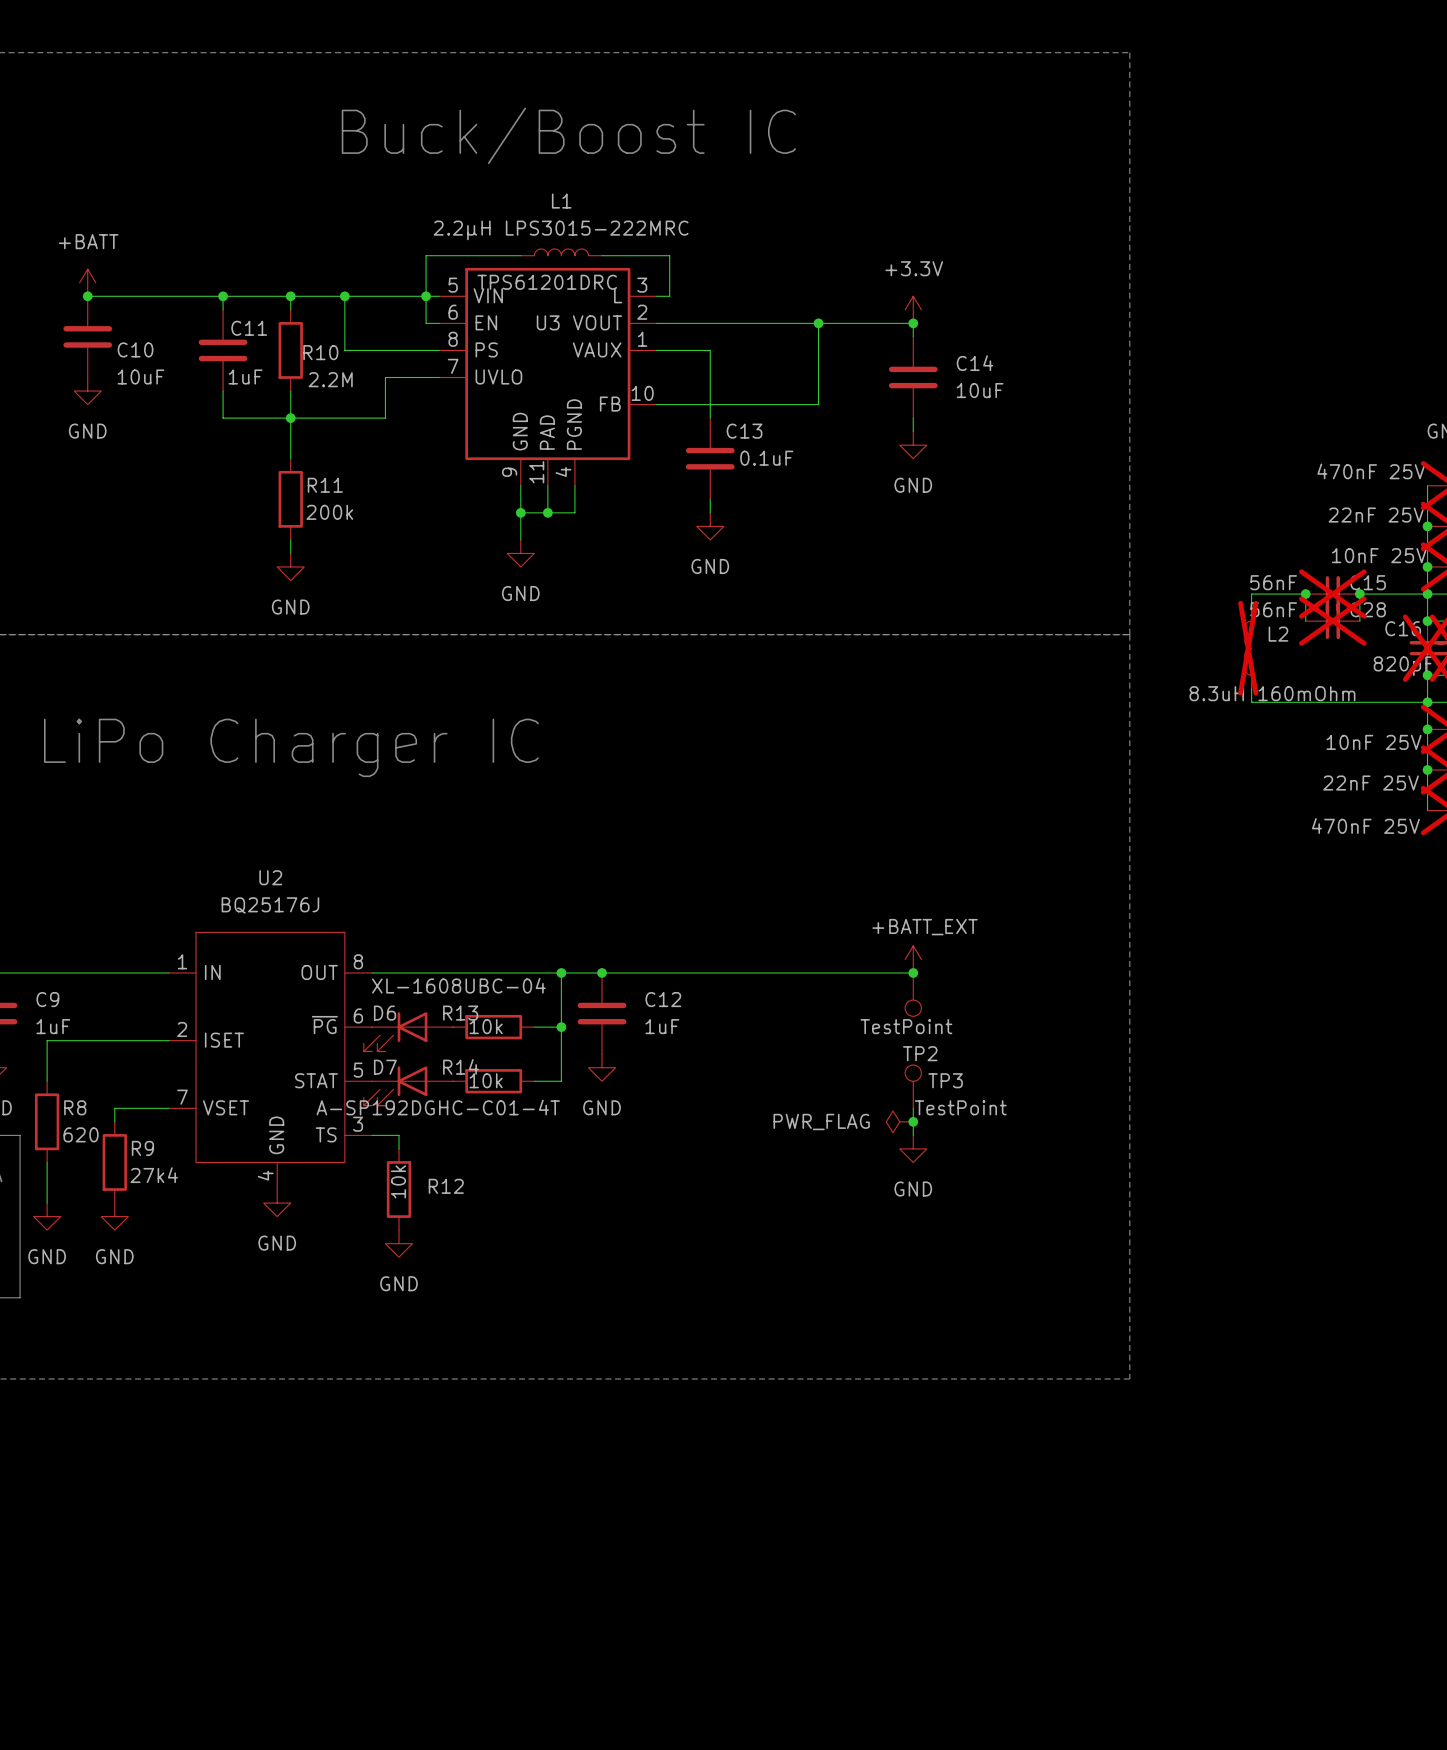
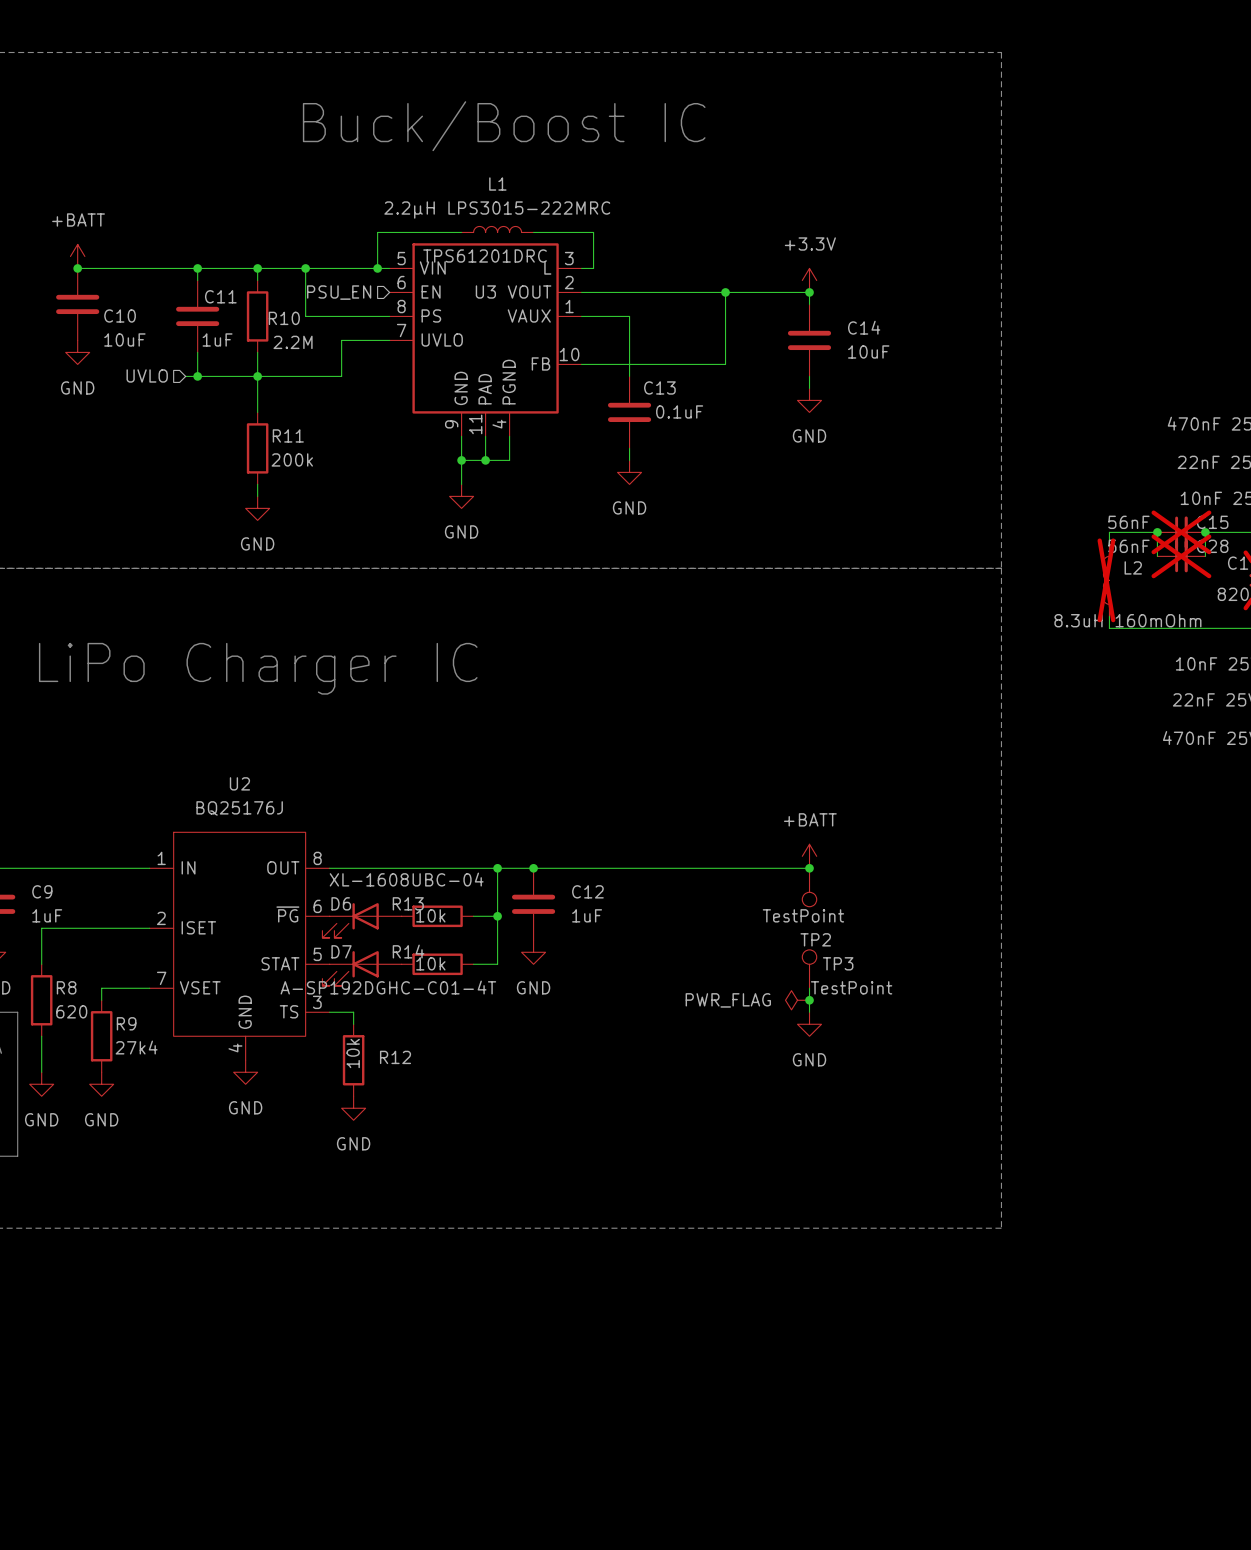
wire: (426, 296) (426, 323) (439, 323) -> none
hierarchical label: none -> PSU_EN (339, 292)
hierarchical label: none -> UVLO (147, 375)
wire: none -> (185, 376) (197, 376)
junction: none -> (197, 376)
power symbol: +BATT_EXT (913, 959) -> +BATT (809, 856)

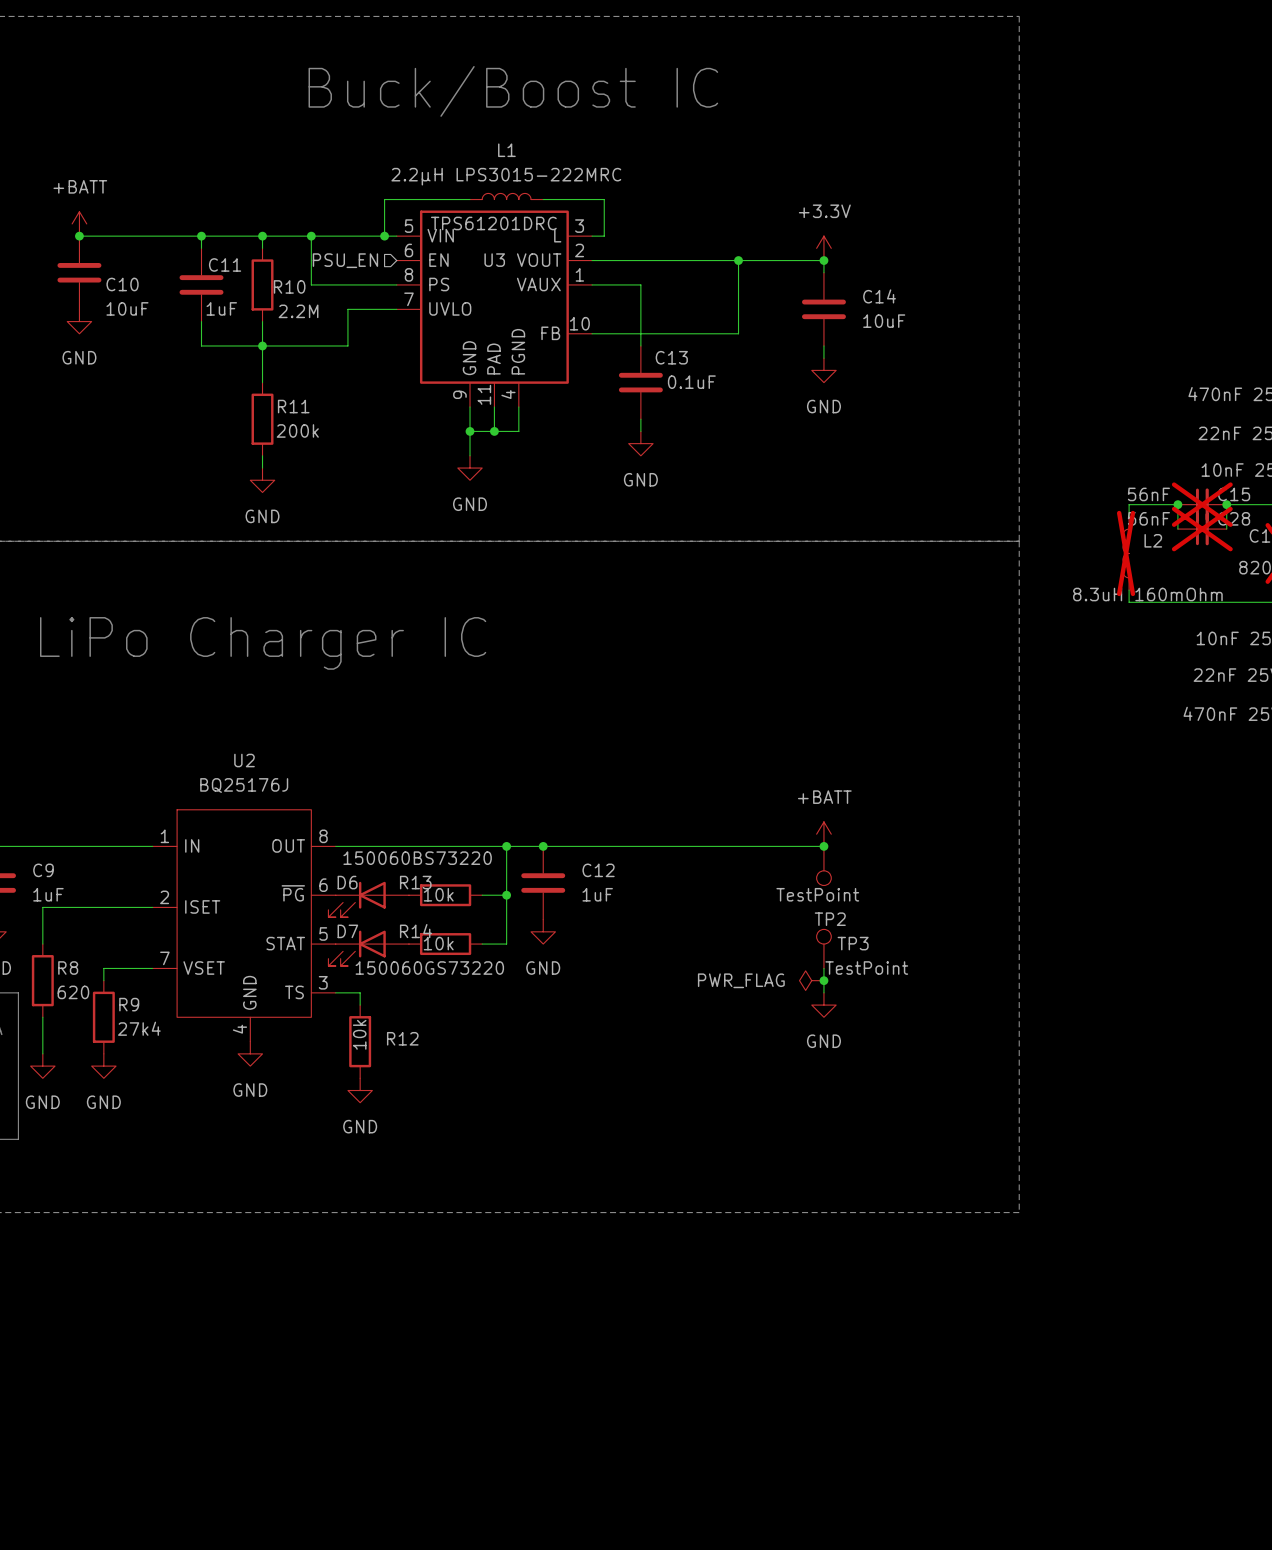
hierarchical label: UVLO (147, 375) -> none
wire: (185, 376) (197, 376) -> none
junction: (197, 376) -> none
D6 value: XL-1608UBC-04 (406, 879) -> 150060BS73220 (417, 858)
D7 value: A-SP192DGHC-C01-4T (388, 987) -> 150060GS73220 (429, 968)

